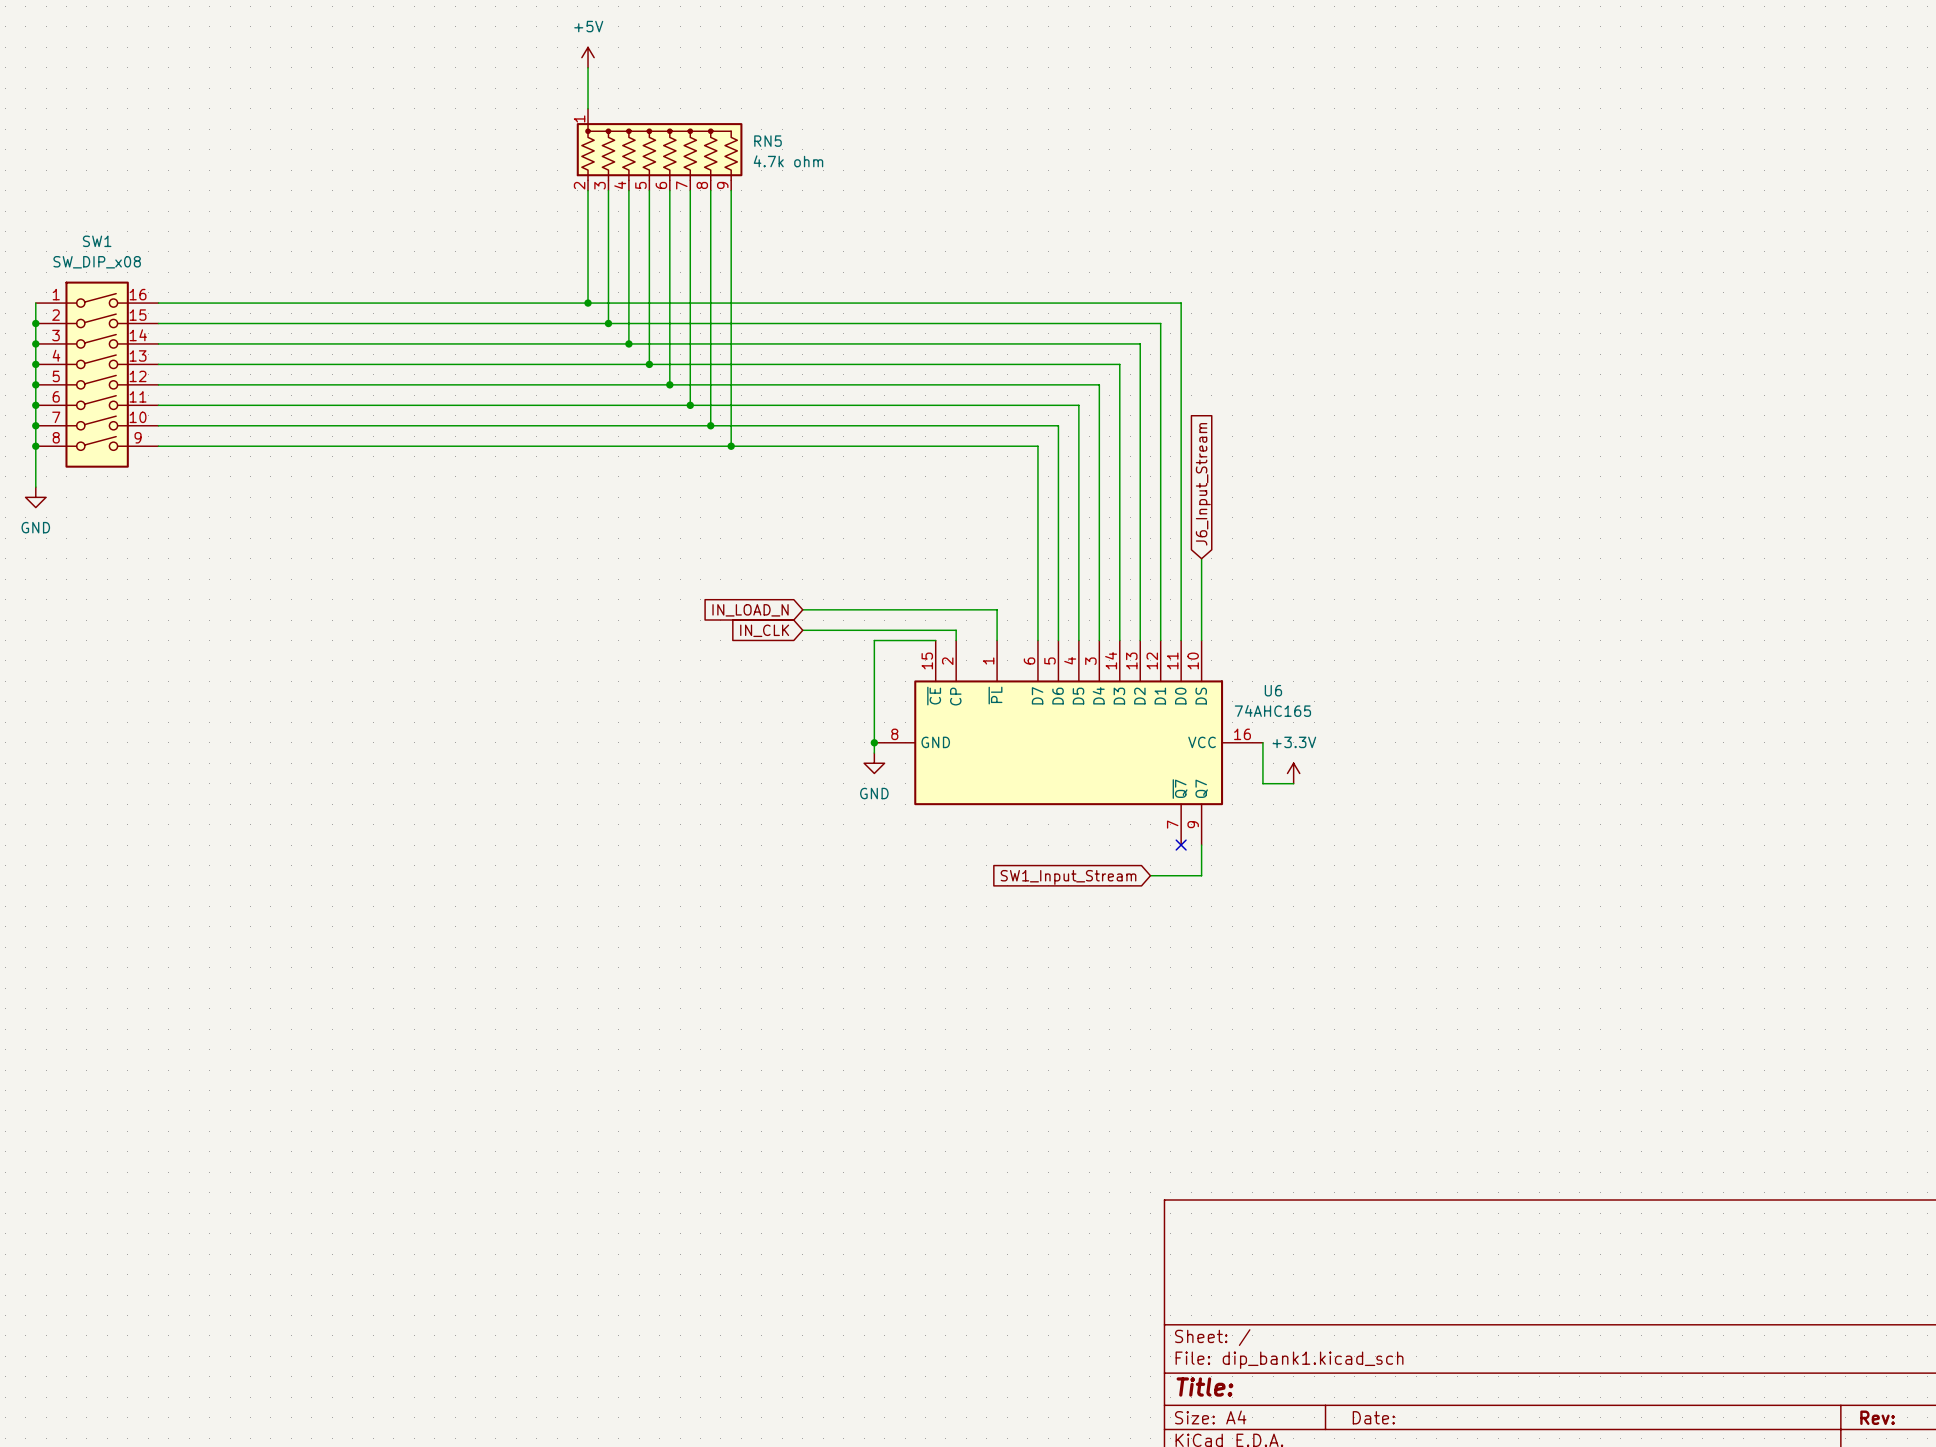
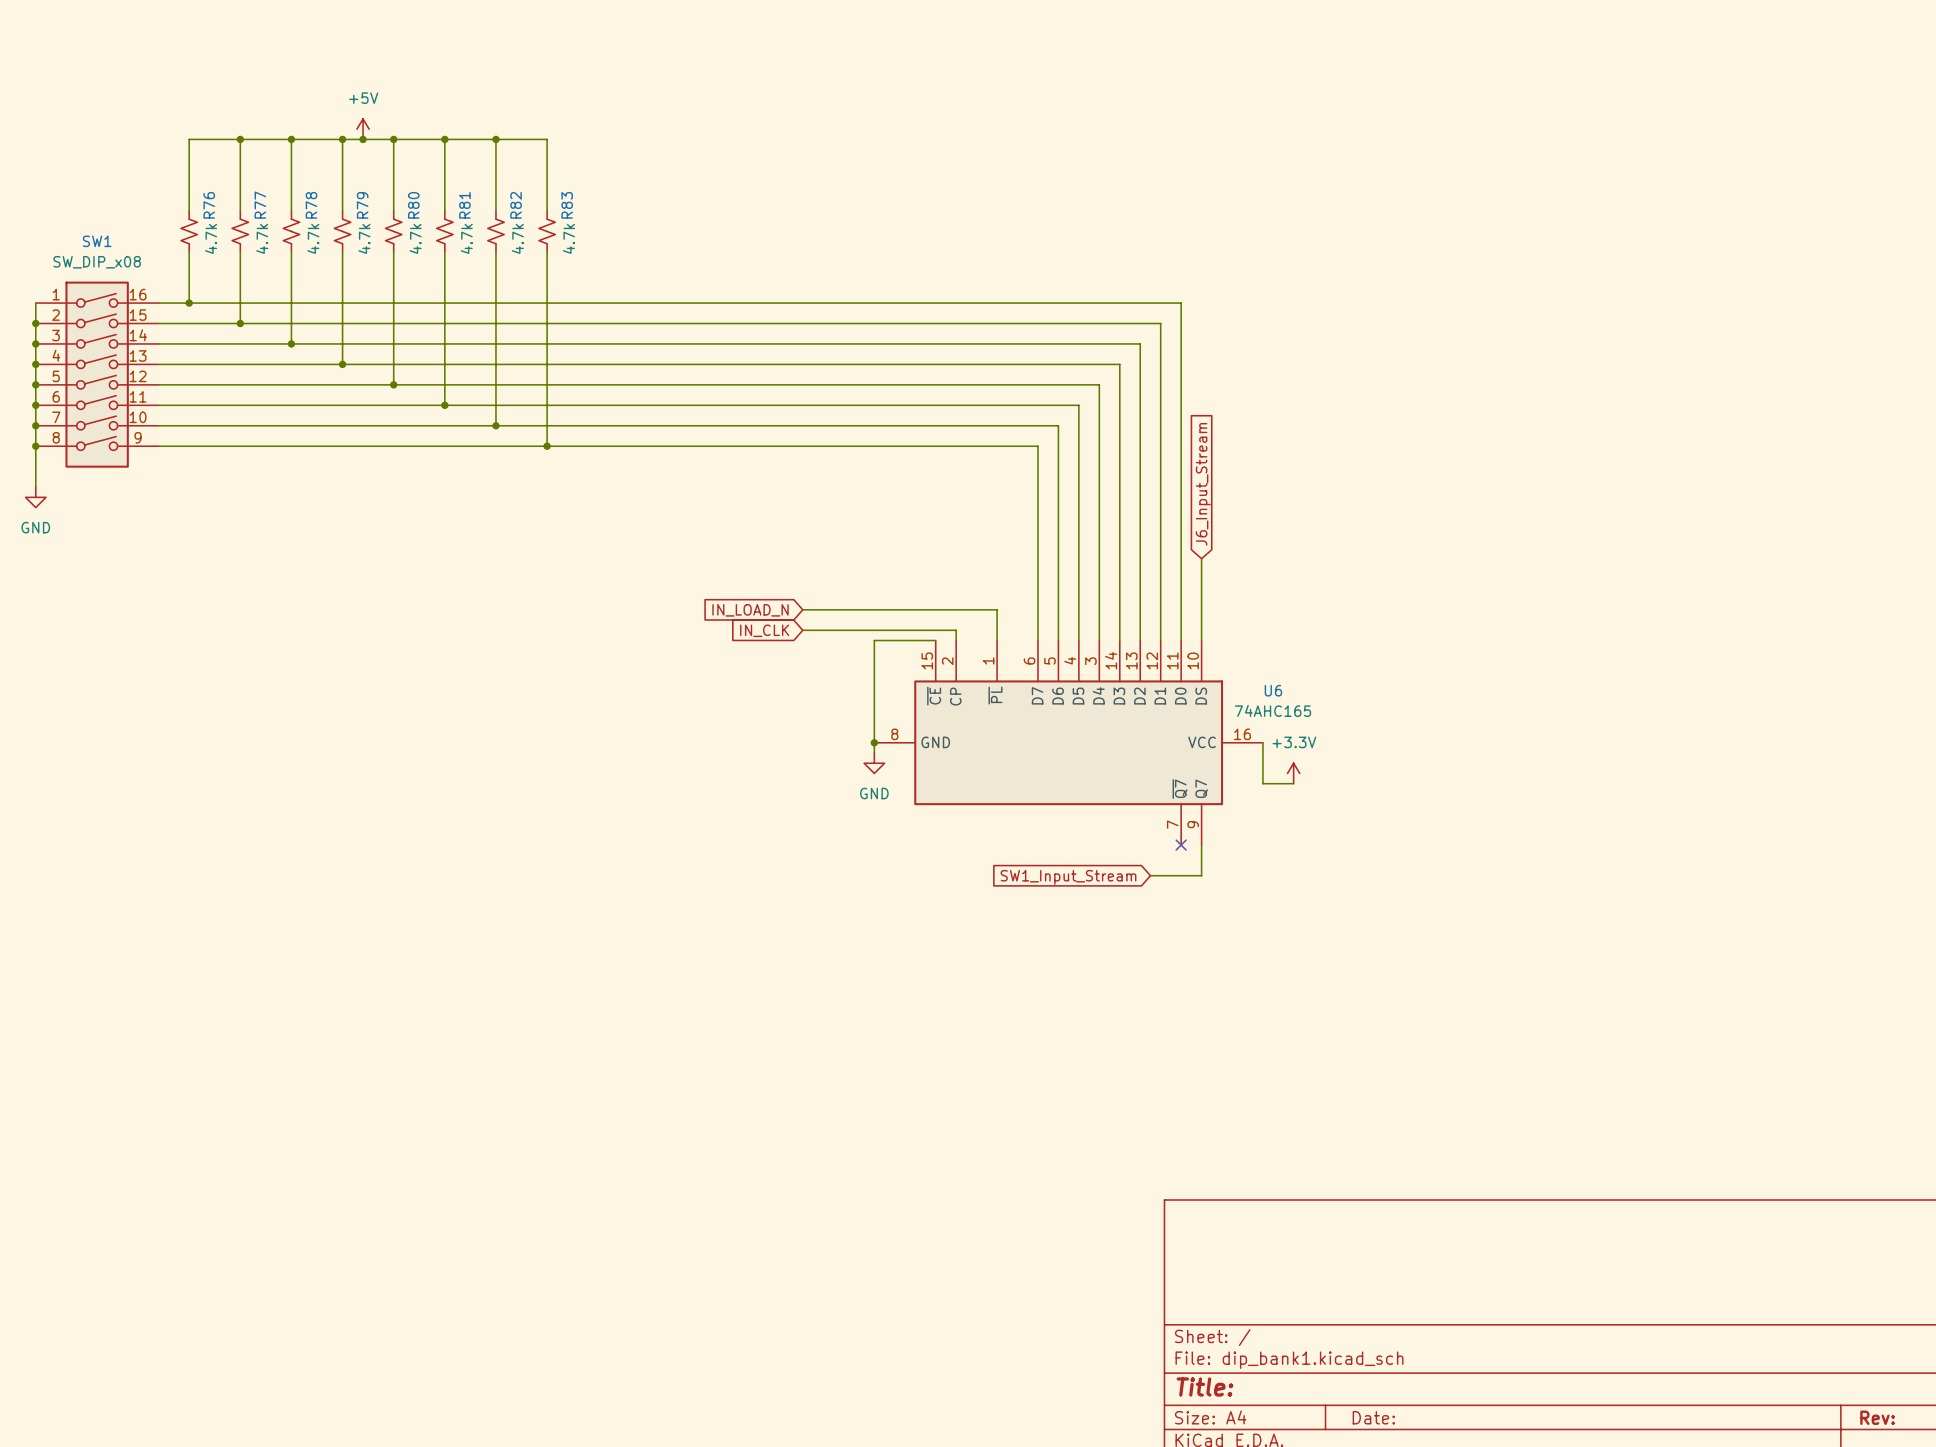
power symbol: +5V (588, 57) -> none
wire: (588, 67) (588, 108) -> none
power symbol: none -> +5V (363, 129)
wire: none -> (240, 139) (240, 211)
junction: none -> (240, 139)
wire: none -> (291, 139) (291, 211)
junction: none -> (291, 139)
wire: none -> (342, 139) (342, 211)
junction: none -> (342, 139)
junction: none -> (363, 139)
wire: none -> (393, 139) (393, 211)
junction: none -> (393, 139)
wire: none -> (444, 139) (444, 211)
junction: none -> (444, 139)
wire: none -> (495, 139) (495, 211)
junction: none -> (495, 139)
RN5: 4.7k ohm (659, 149) -> none
wire: (588, 190) (588, 303) -> none
wire: (608, 190) (608, 323) -> none
wire: (628, 190) (628, 343) -> (444, 251) (444, 405)
wire: (649, 190) (649, 364) -> (495, 251) (495, 425)
wire: (669, 190) (669, 384) -> (547, 251) (547, 446)
wire: (690, 190) (690, 405) -> none
wire: (710, 190) (710, 425) -> none
wire: (731, 190) (731, 446) -> none
wire: none -> (189, 211) (189, 139) (547, 139) (547, 211)
R76: none -> 4.7k (189, 231)
R77: none -> 4.7k (240, 231)
R78: none -> 4.7k (291, 231)
R79: none -> 4.7k (342, 231)
R80: none -> 4.7k (393, 231)
R81: none -> 4.7k (444, 231)
R82: none -> 4.7k (495, 231)
R83: none -> 4.7k (547, 231)
wire: none -> (189, 251) (189, 303)
wire: none -> (240, 251) (240, 323)
wire: none -> (291, 251) (291, 343)
wire: none -> (342, 251) (342, 364)
wire: none -> (393, 251) (393, 384)
junction: none -> (189, 303)
junction: (588, 303) -> none
junction: none -> (240, 323)
junction: (608, 323) -> none
junction: none -> (291, 343)
junction: (628, 343) -> none
junction: none -> (342, 364)
junction: (649, 364) -> none
junction: none -> (393, 384)
junction: (669, 384) -> none
junction: none -> (444, 405)
junction: (690, 405) -> none
junction: none -> (495, 425)
junction: (710, 425) -> none
junction: none -> (547, 446)
junction: (731, 446) -> none

